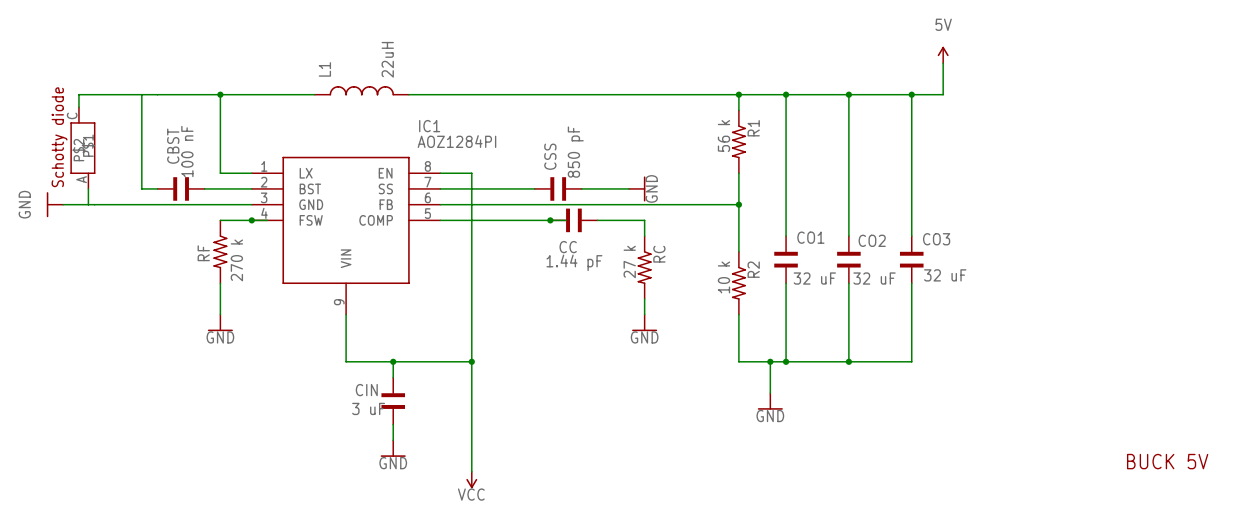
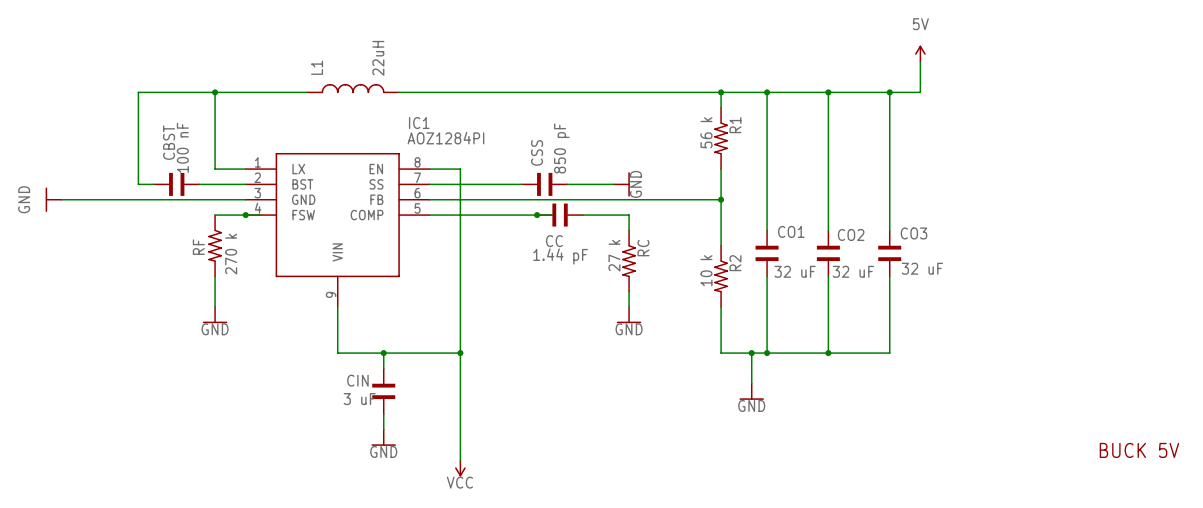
wire: (141, 94) (78, 94) (78, 107) -> none
part: (82, 148) -> none
wire: (88, 188) (88, 204) -> none

